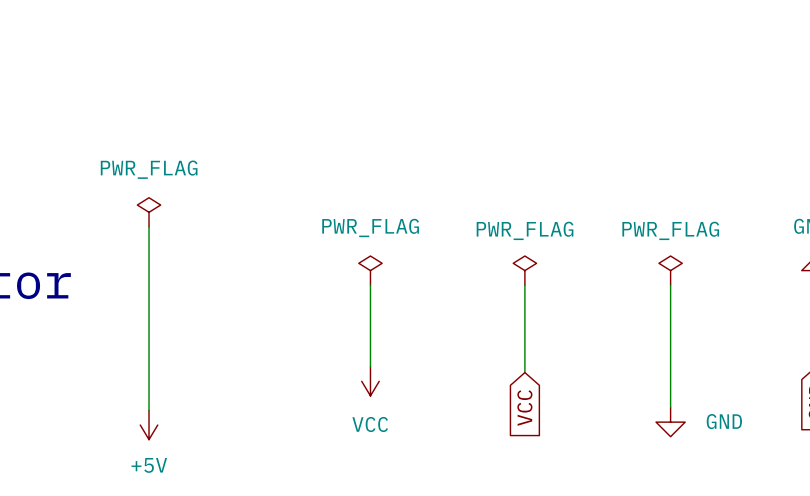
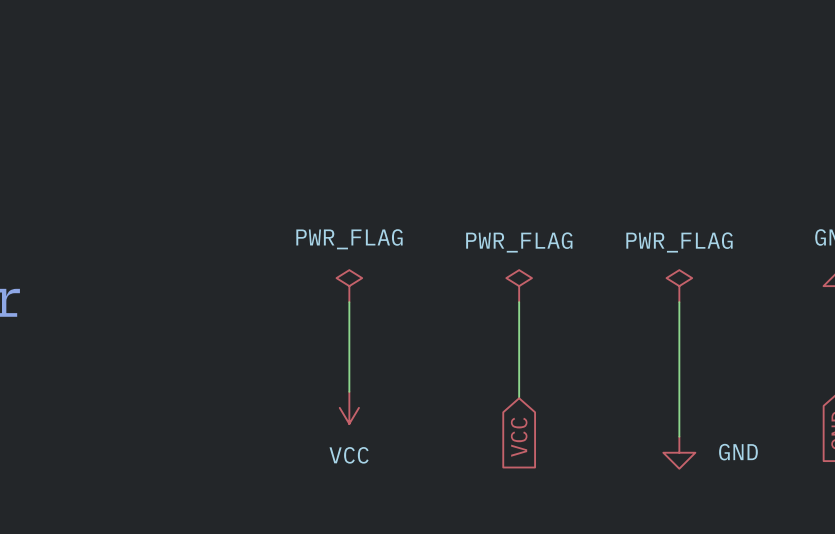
power symbol: PWR_FLAG (149, 212) -> none
wire: (149, 226) (149, 410) -> none
power symbol: +5V (149, 425) -> none

